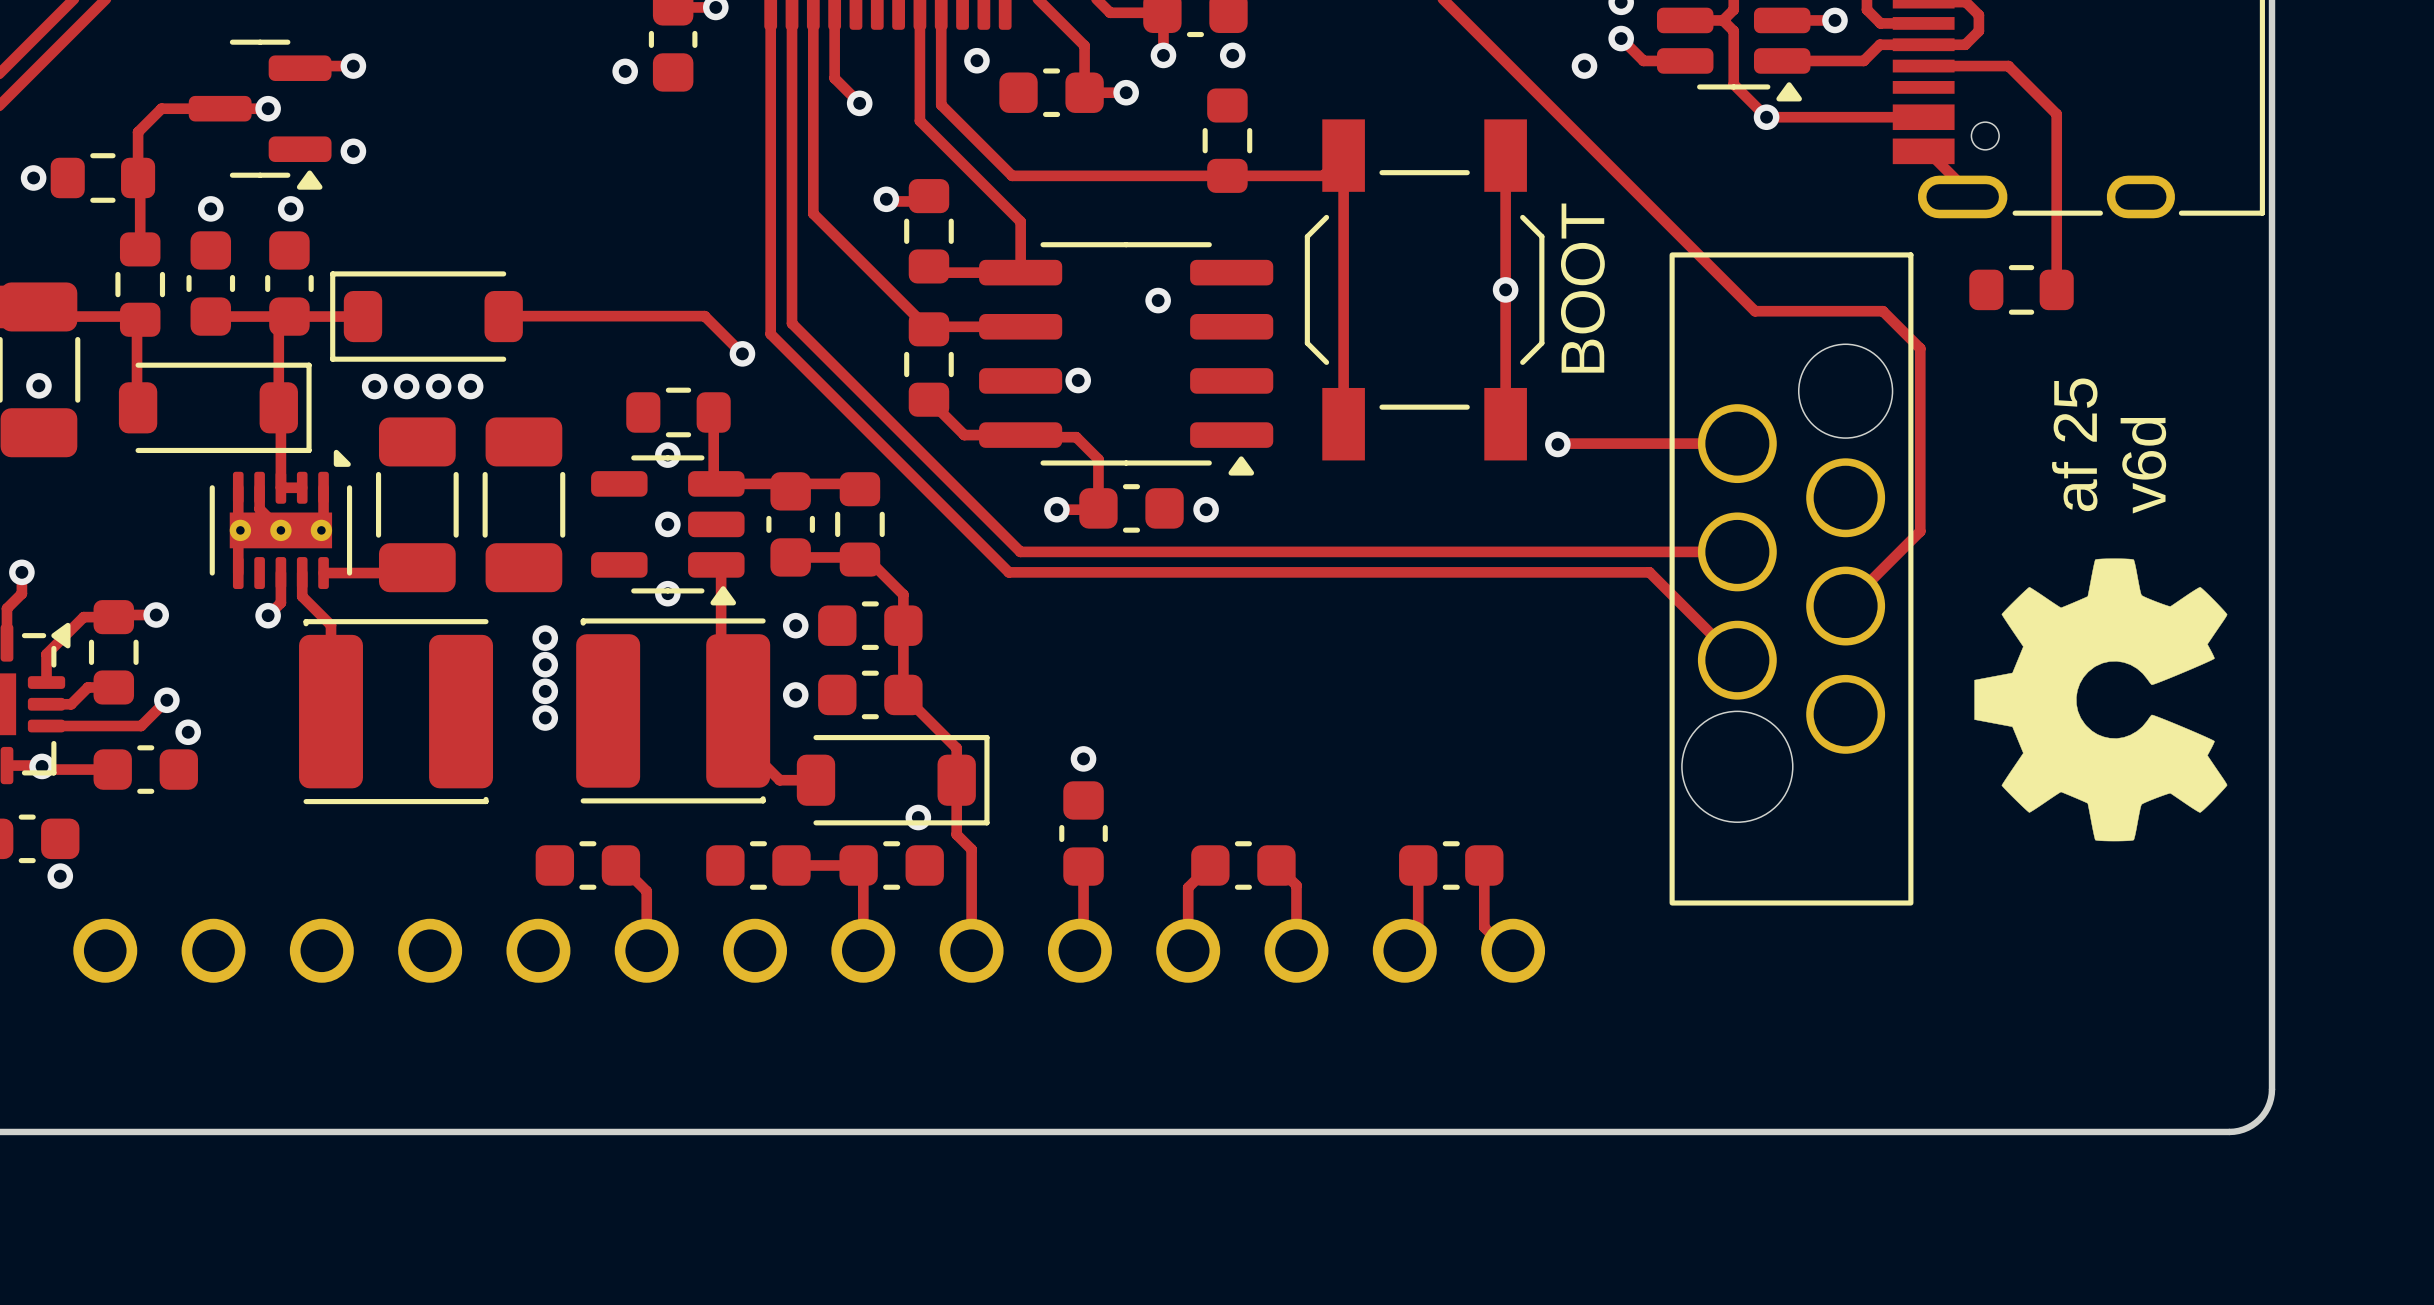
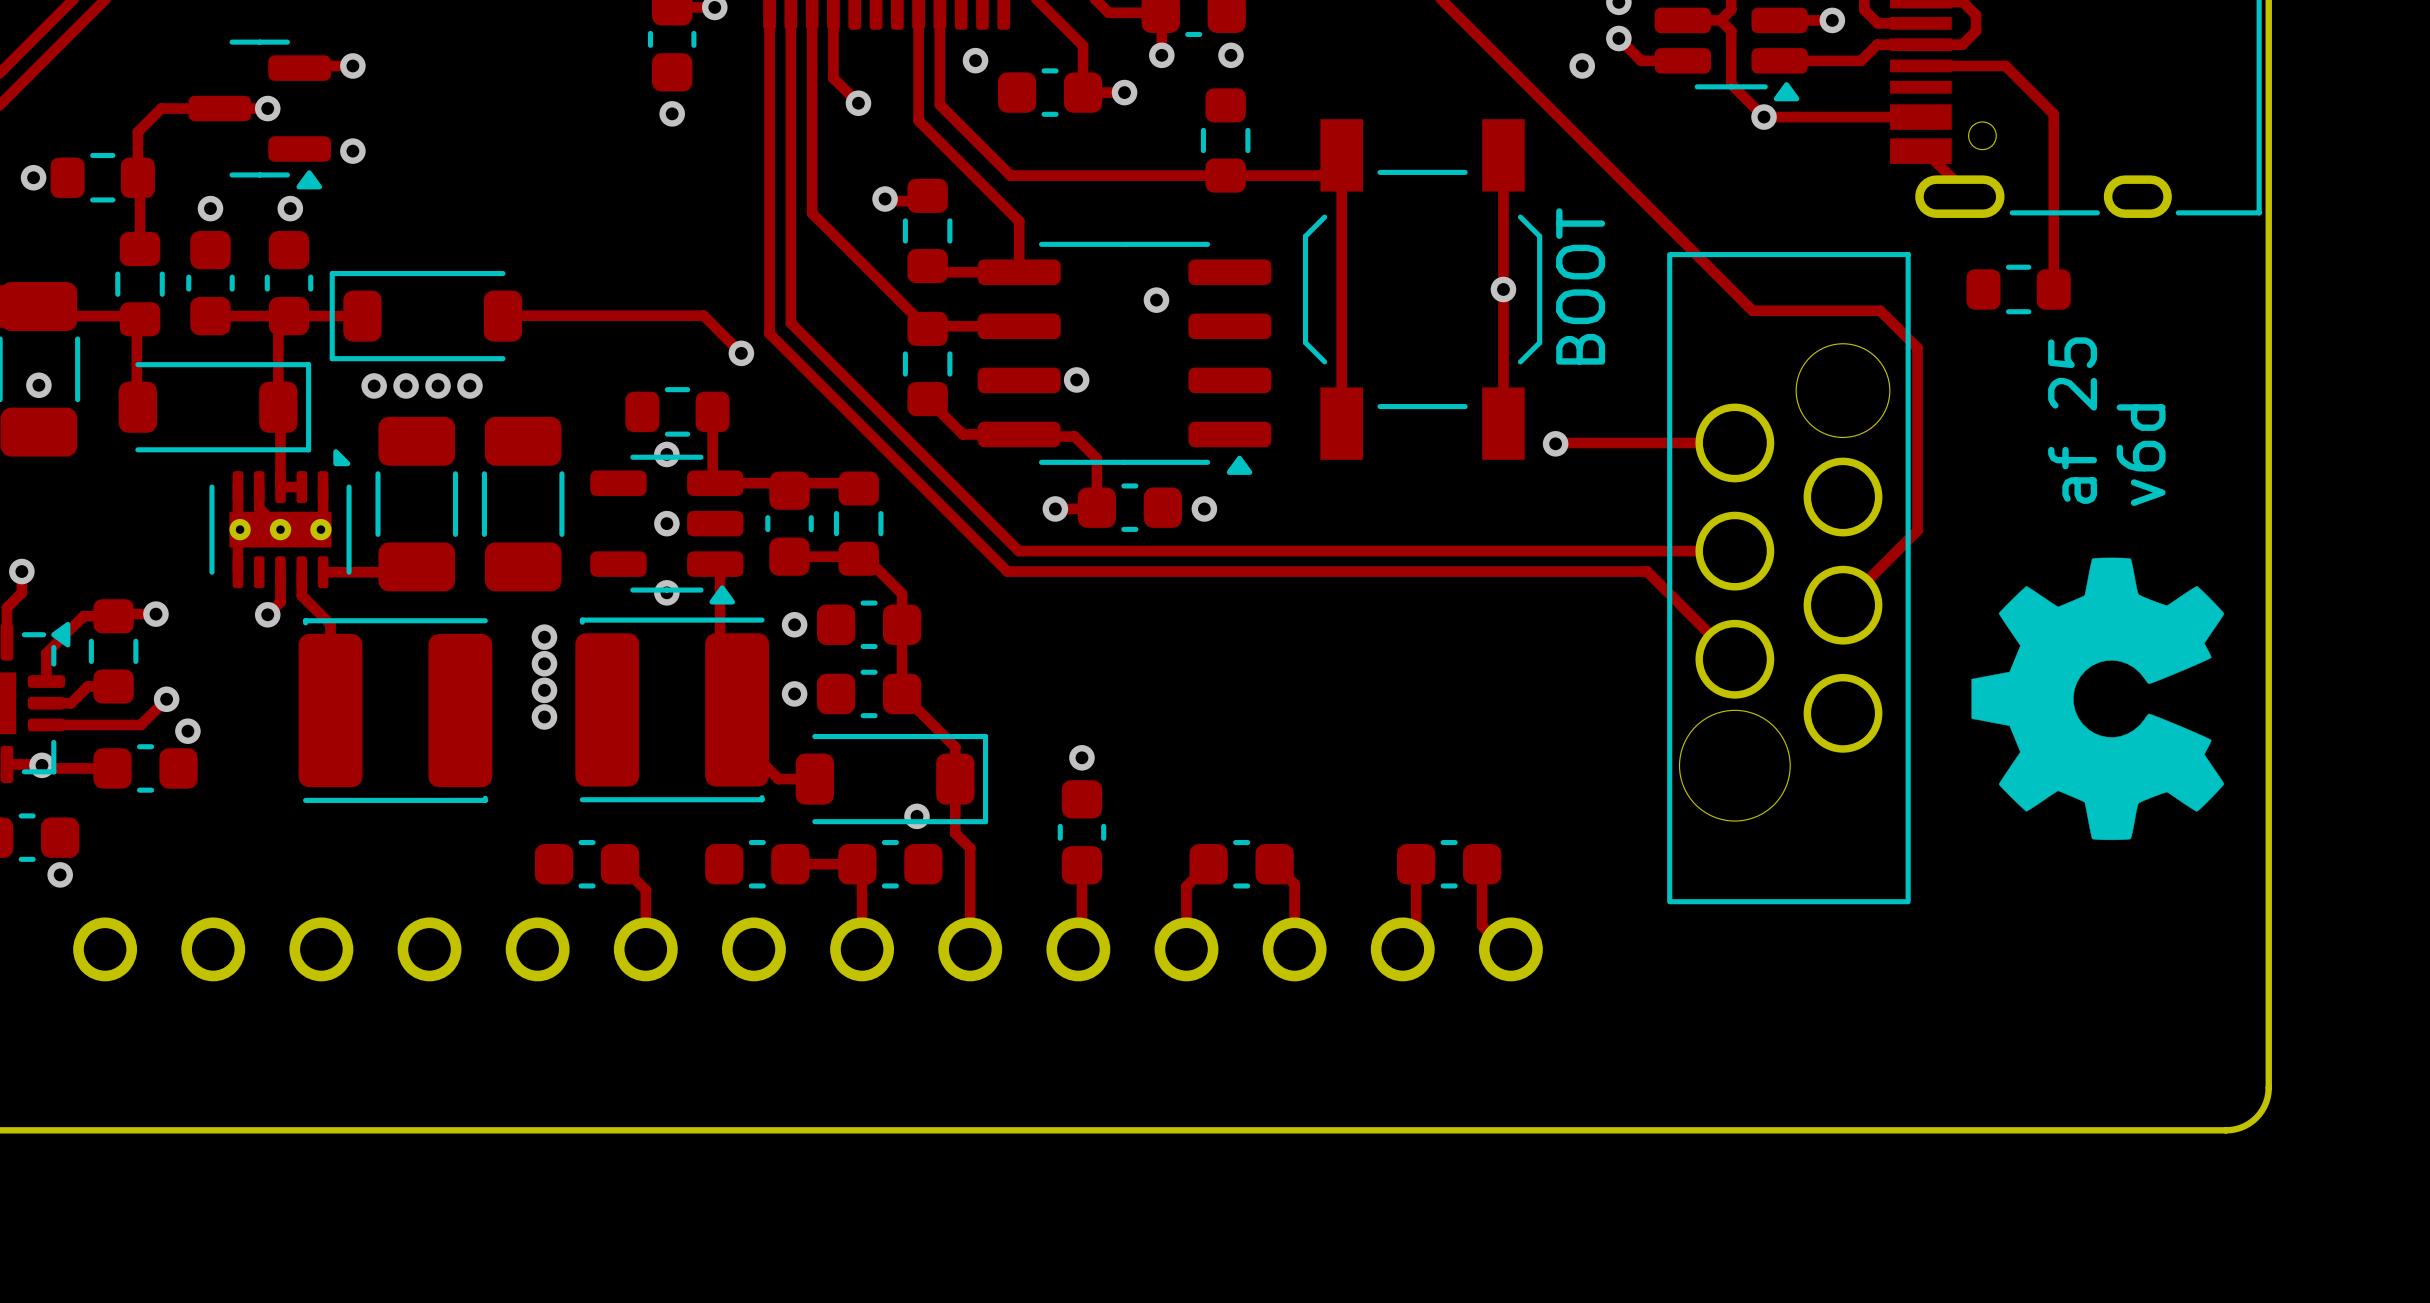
via position: (625, 71) -> (672, 113)

